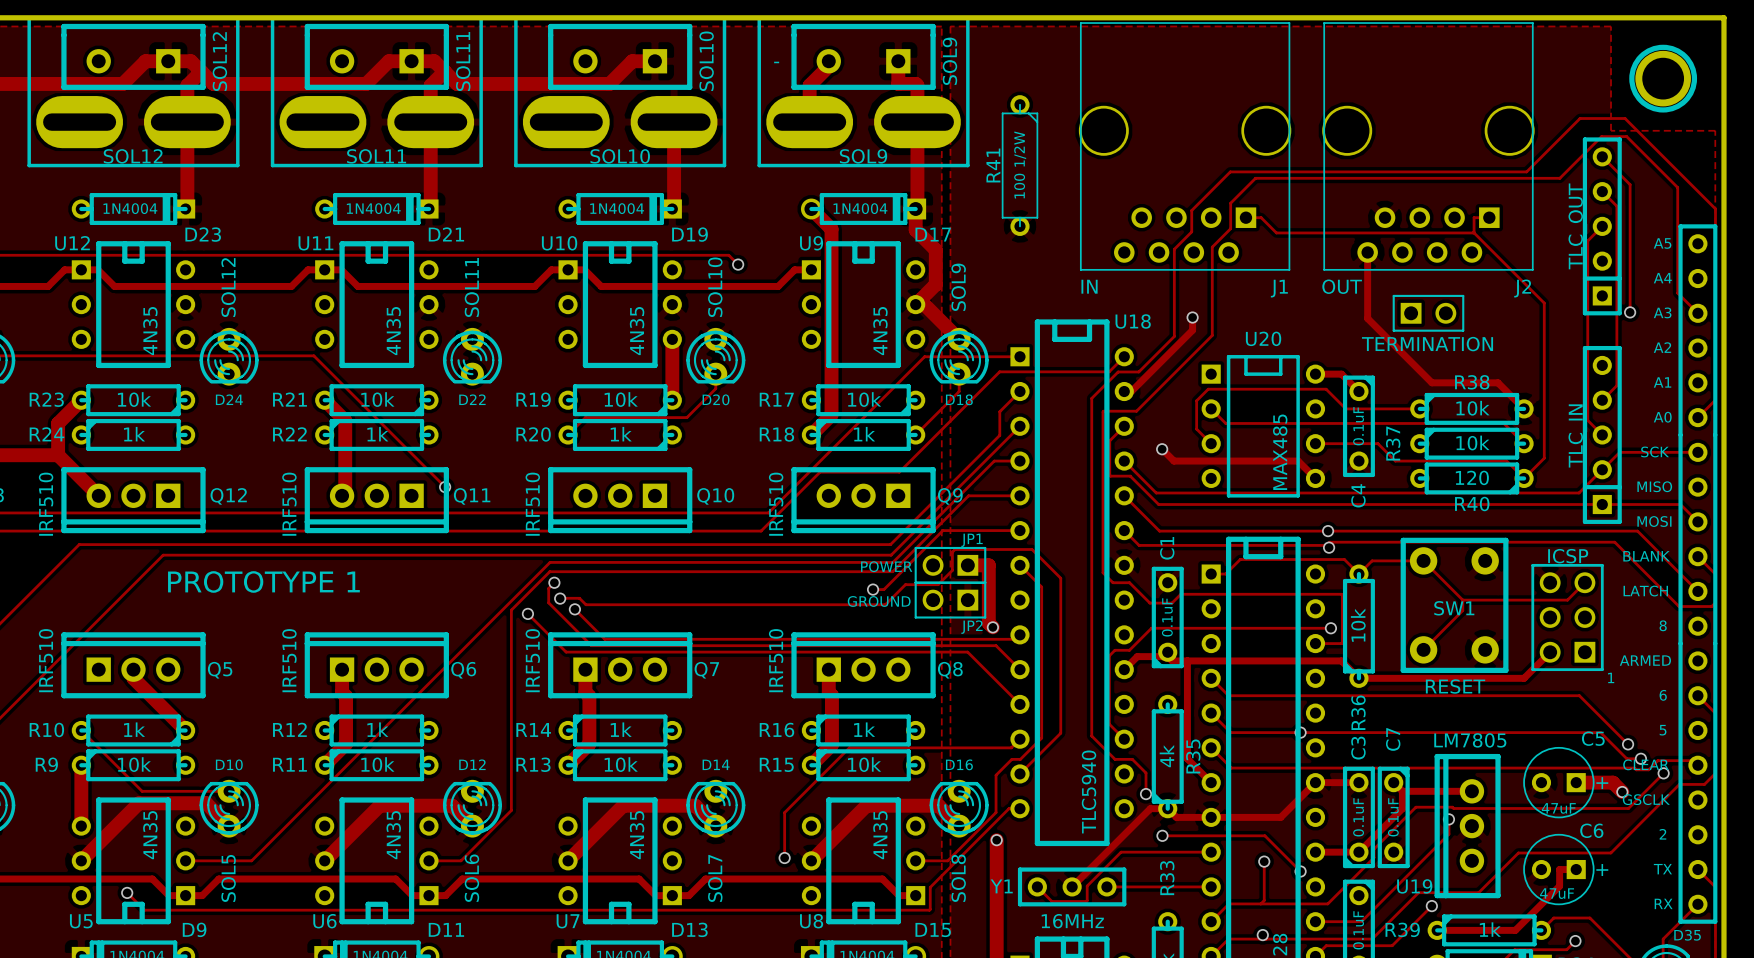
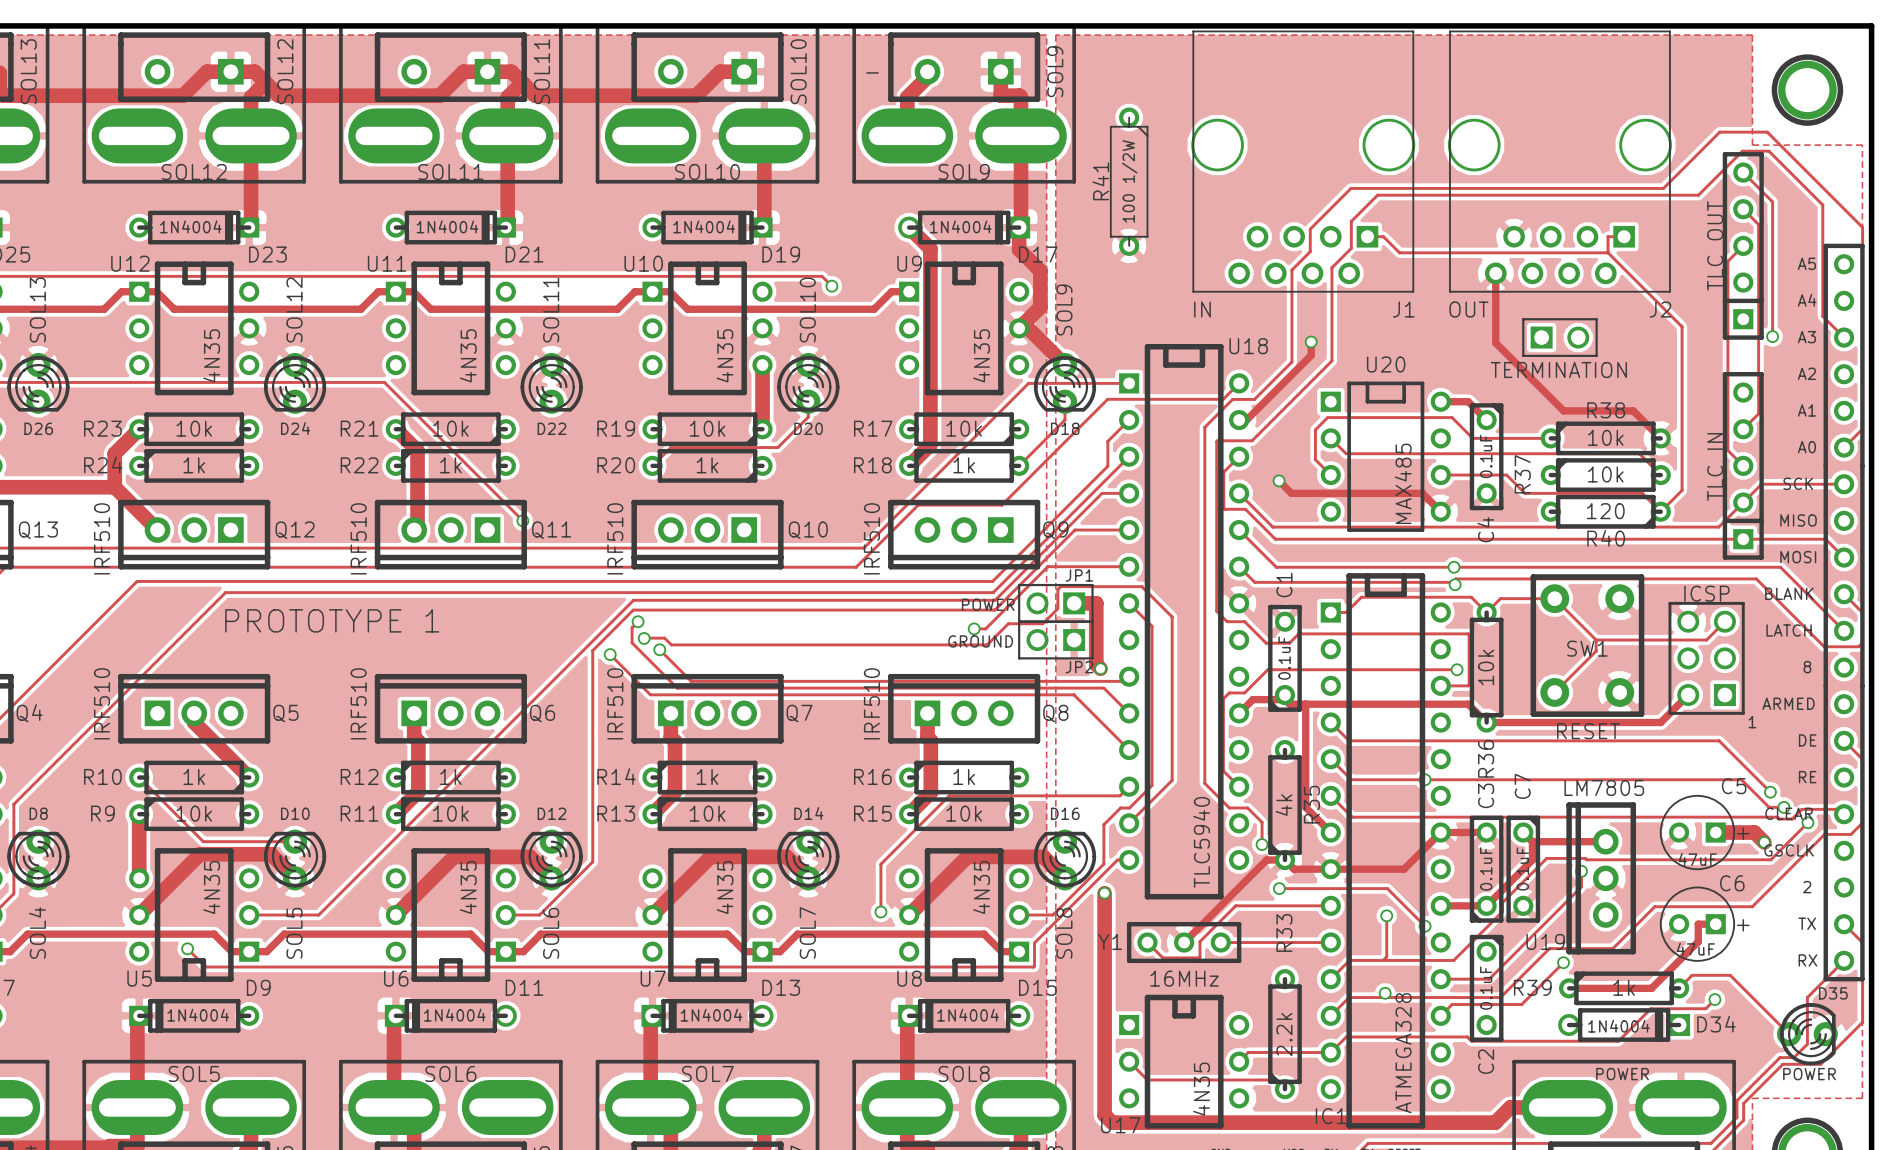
text: 6 (1663, 695) -> DE (1807, 740)
text: 5 (1663, 730) -> RE (1807, 777)

